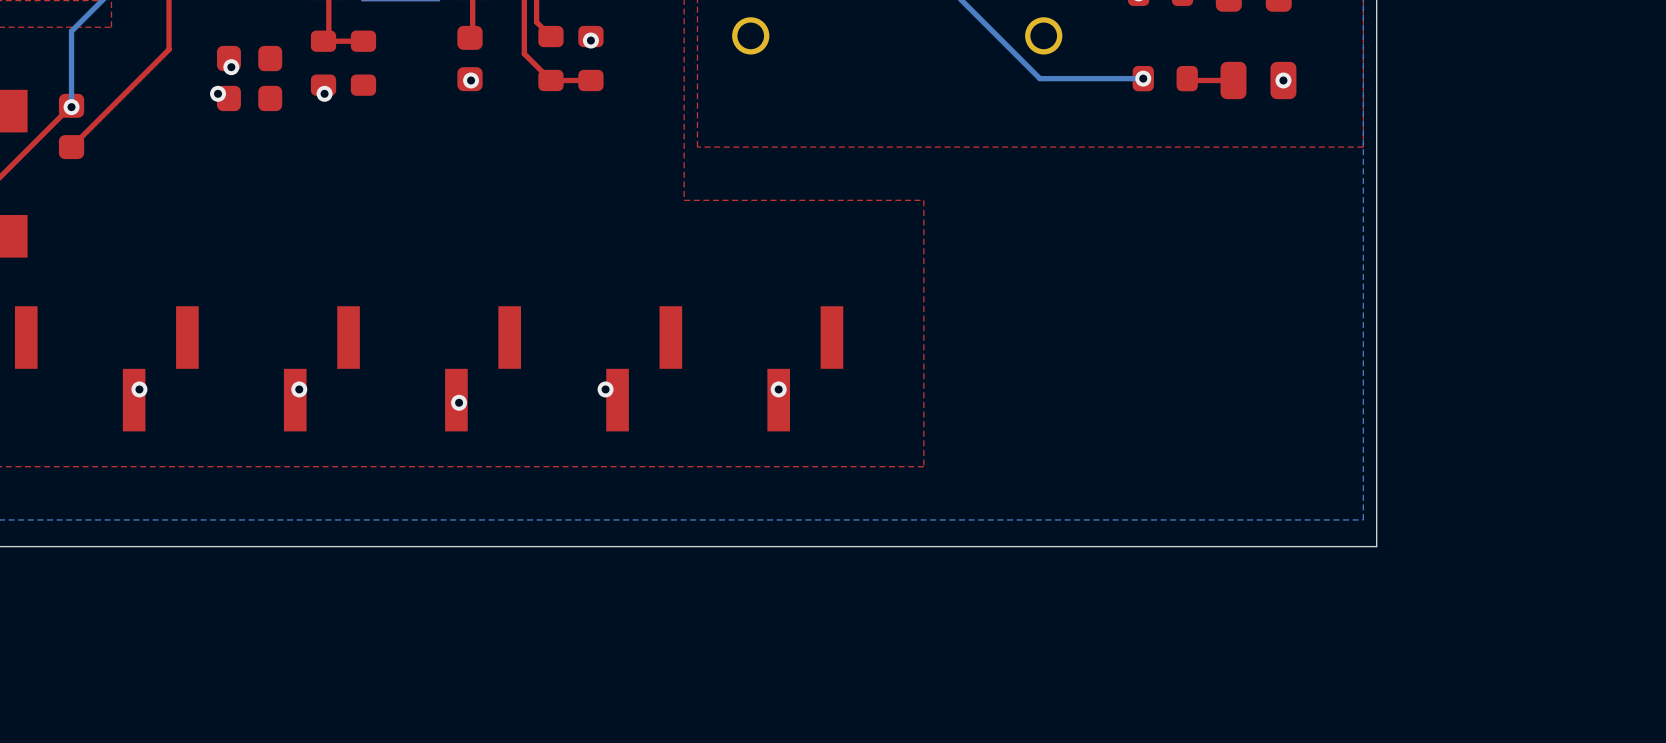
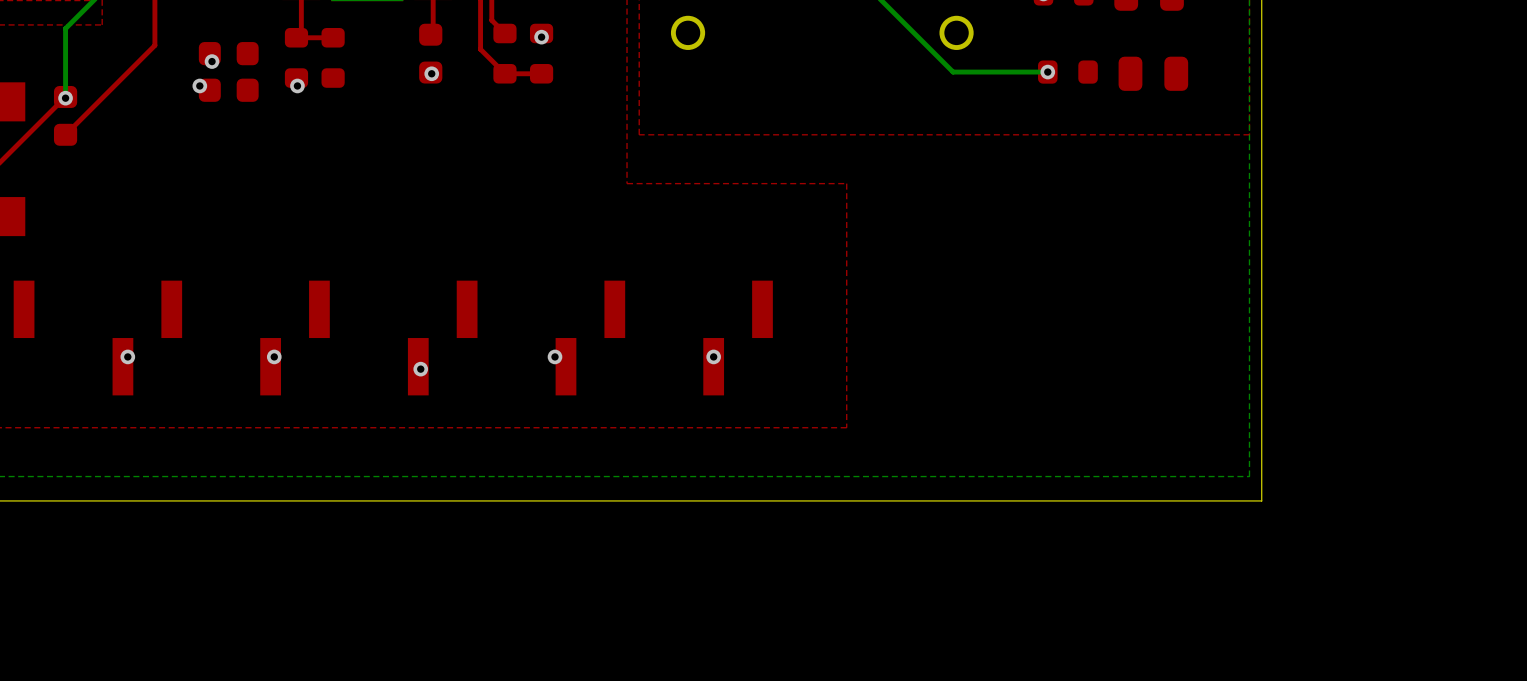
top track: (1187, 78) (1189, 80) (1233, 80) -> none
via: (1283, 80) -> none

